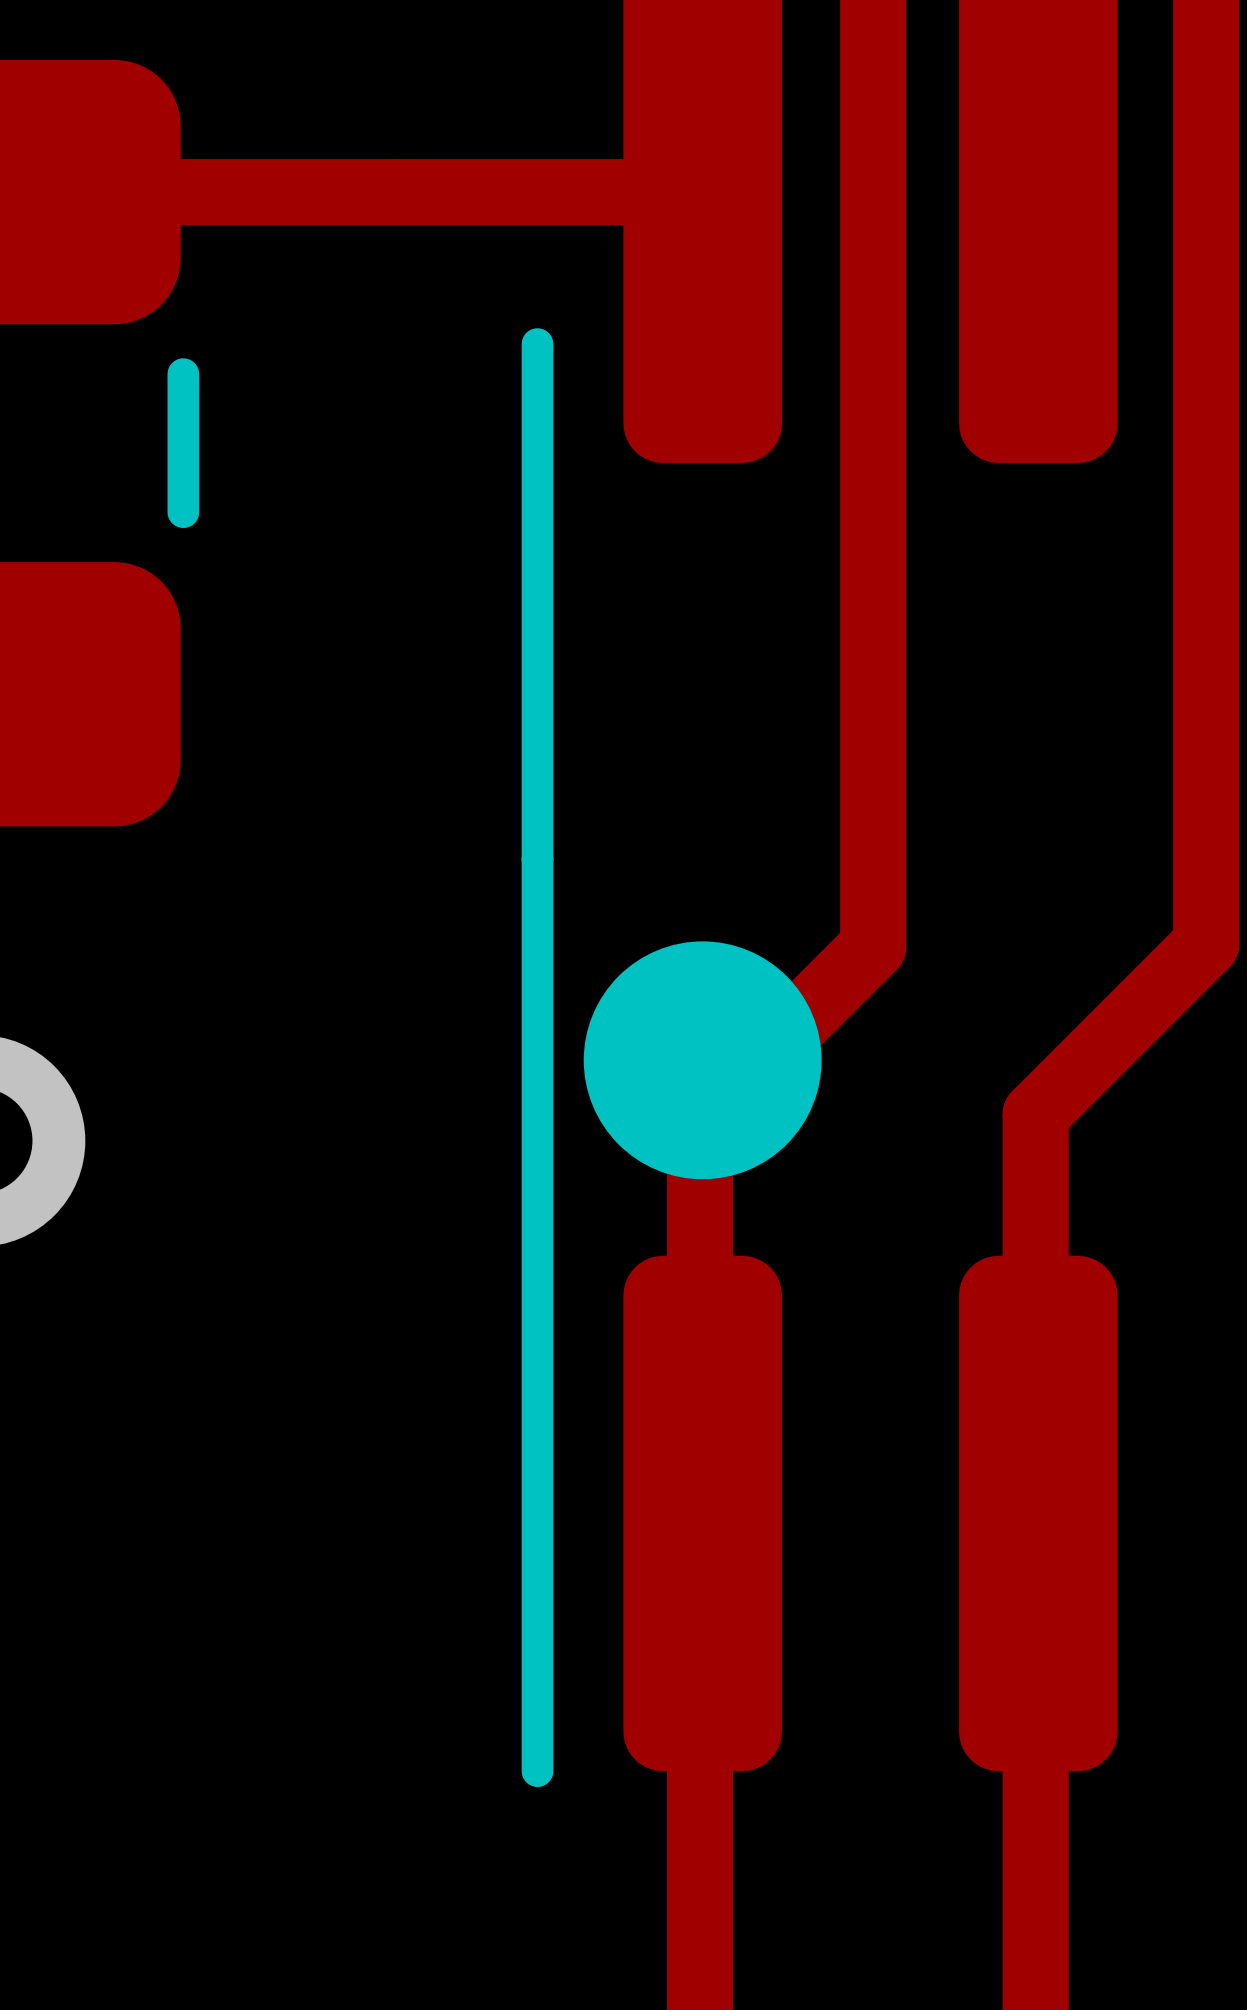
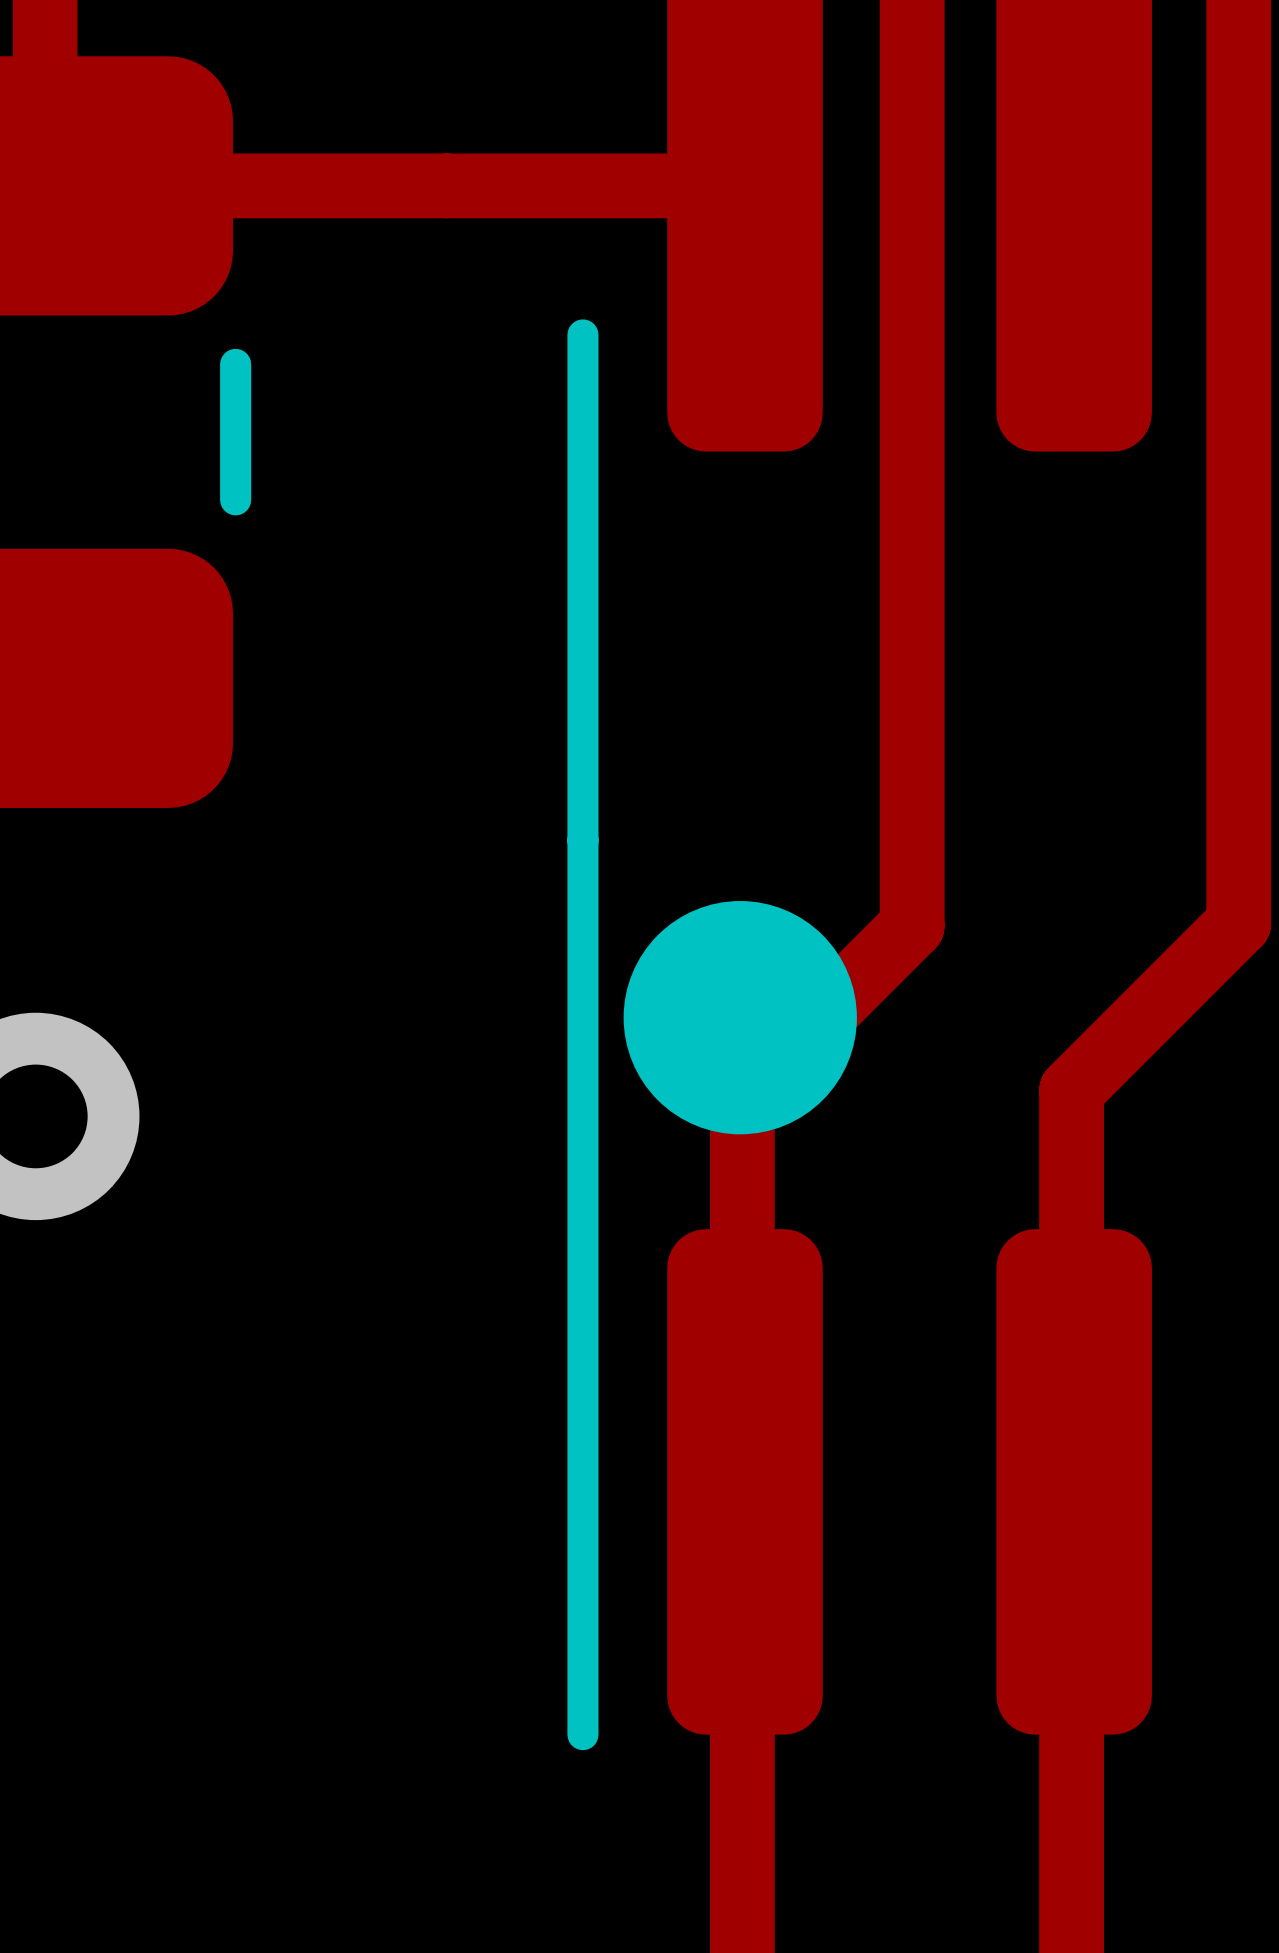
drawing position: (702, 1060) -> (740, 1017)

